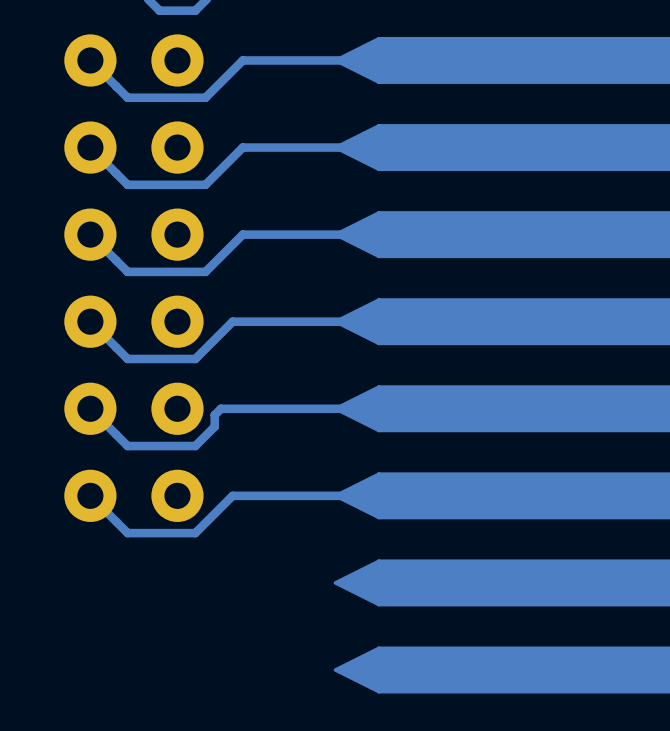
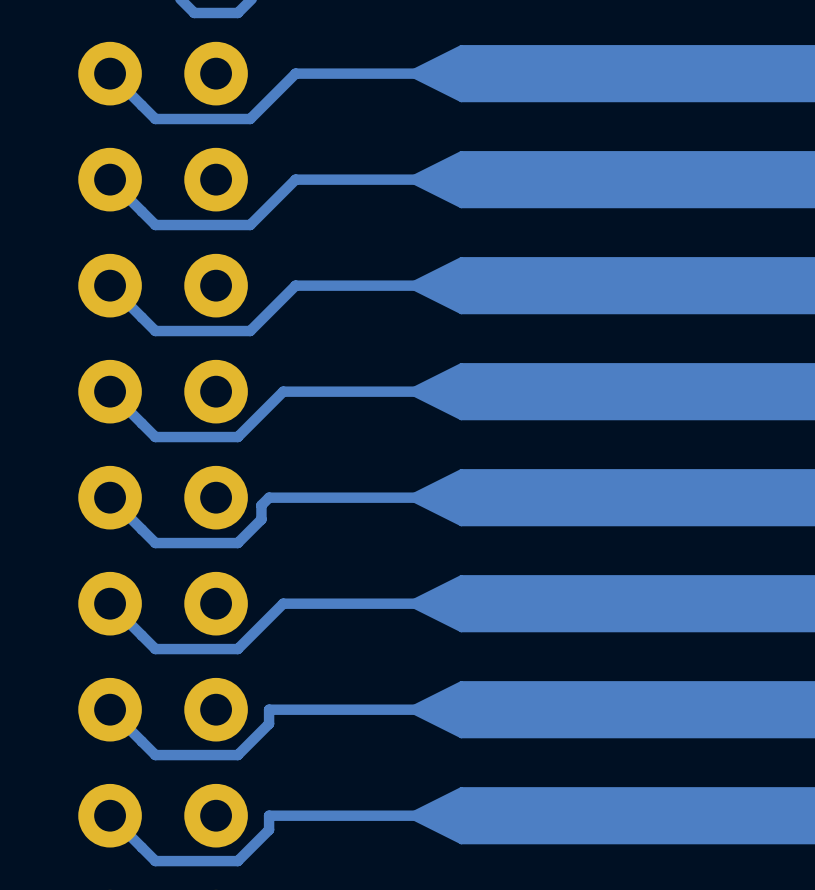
part: none -> (110, 709)
part: none -> (216, 709)
track: none -> (772, 709) (269, 709) (269, 723) (237, 755) (155, 755) (110, 709)
part: none -> (110, 815)
part: none -> (216, 815)
track: none -> (772, 815) (269, 815) (269, 829) (237, 861) (155, 861) (110, 815)

